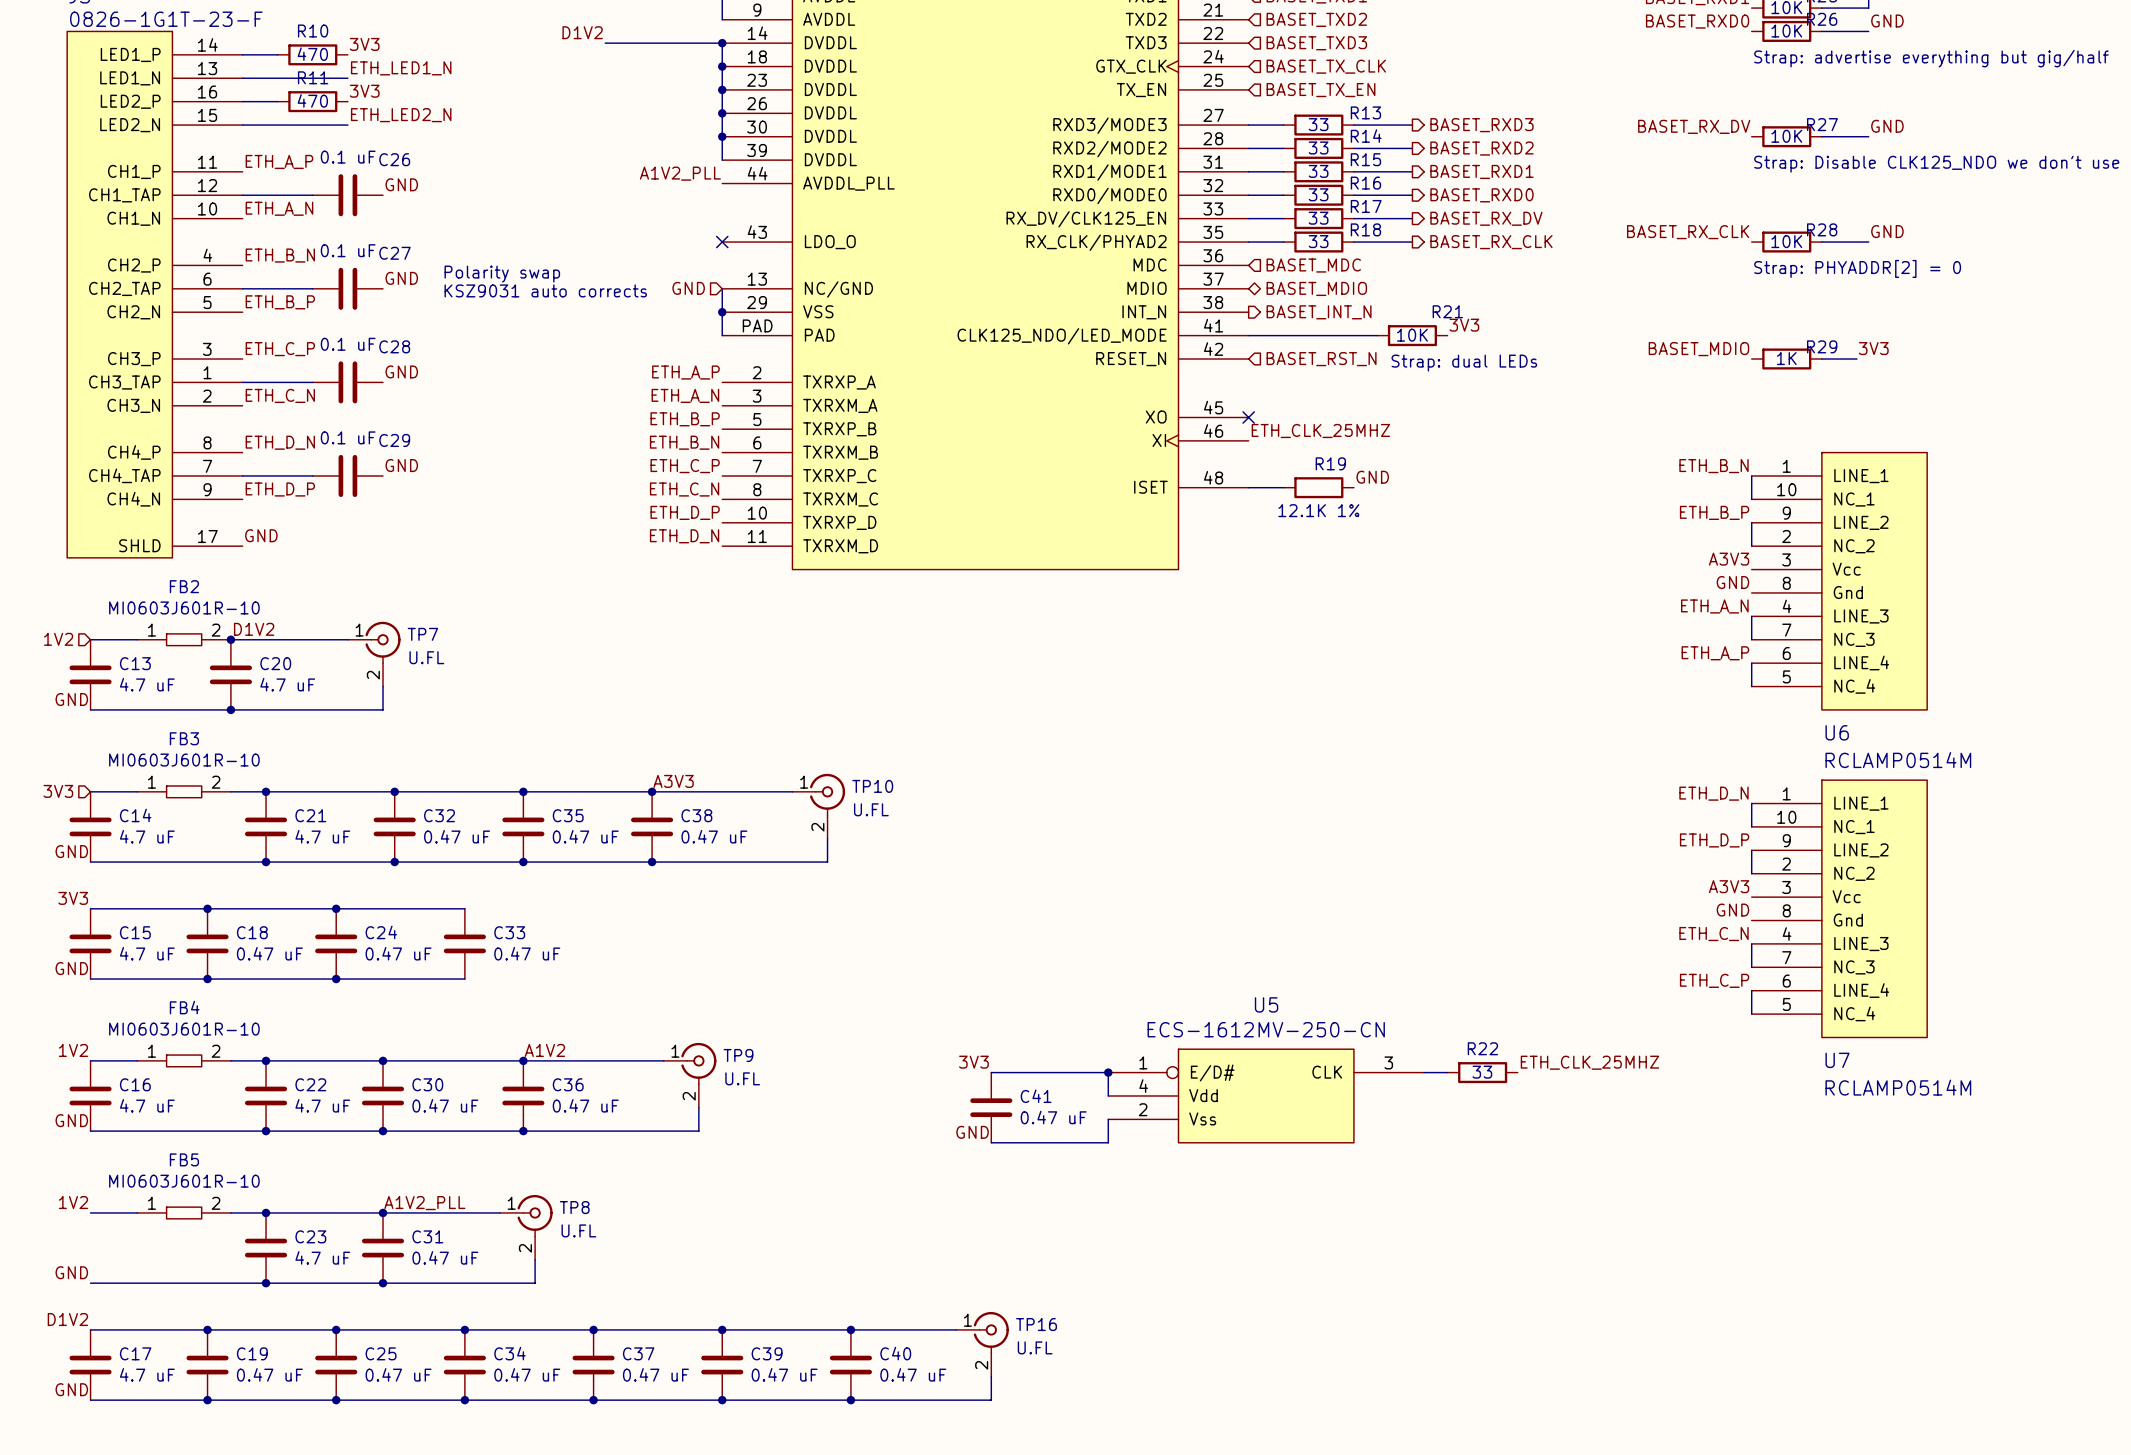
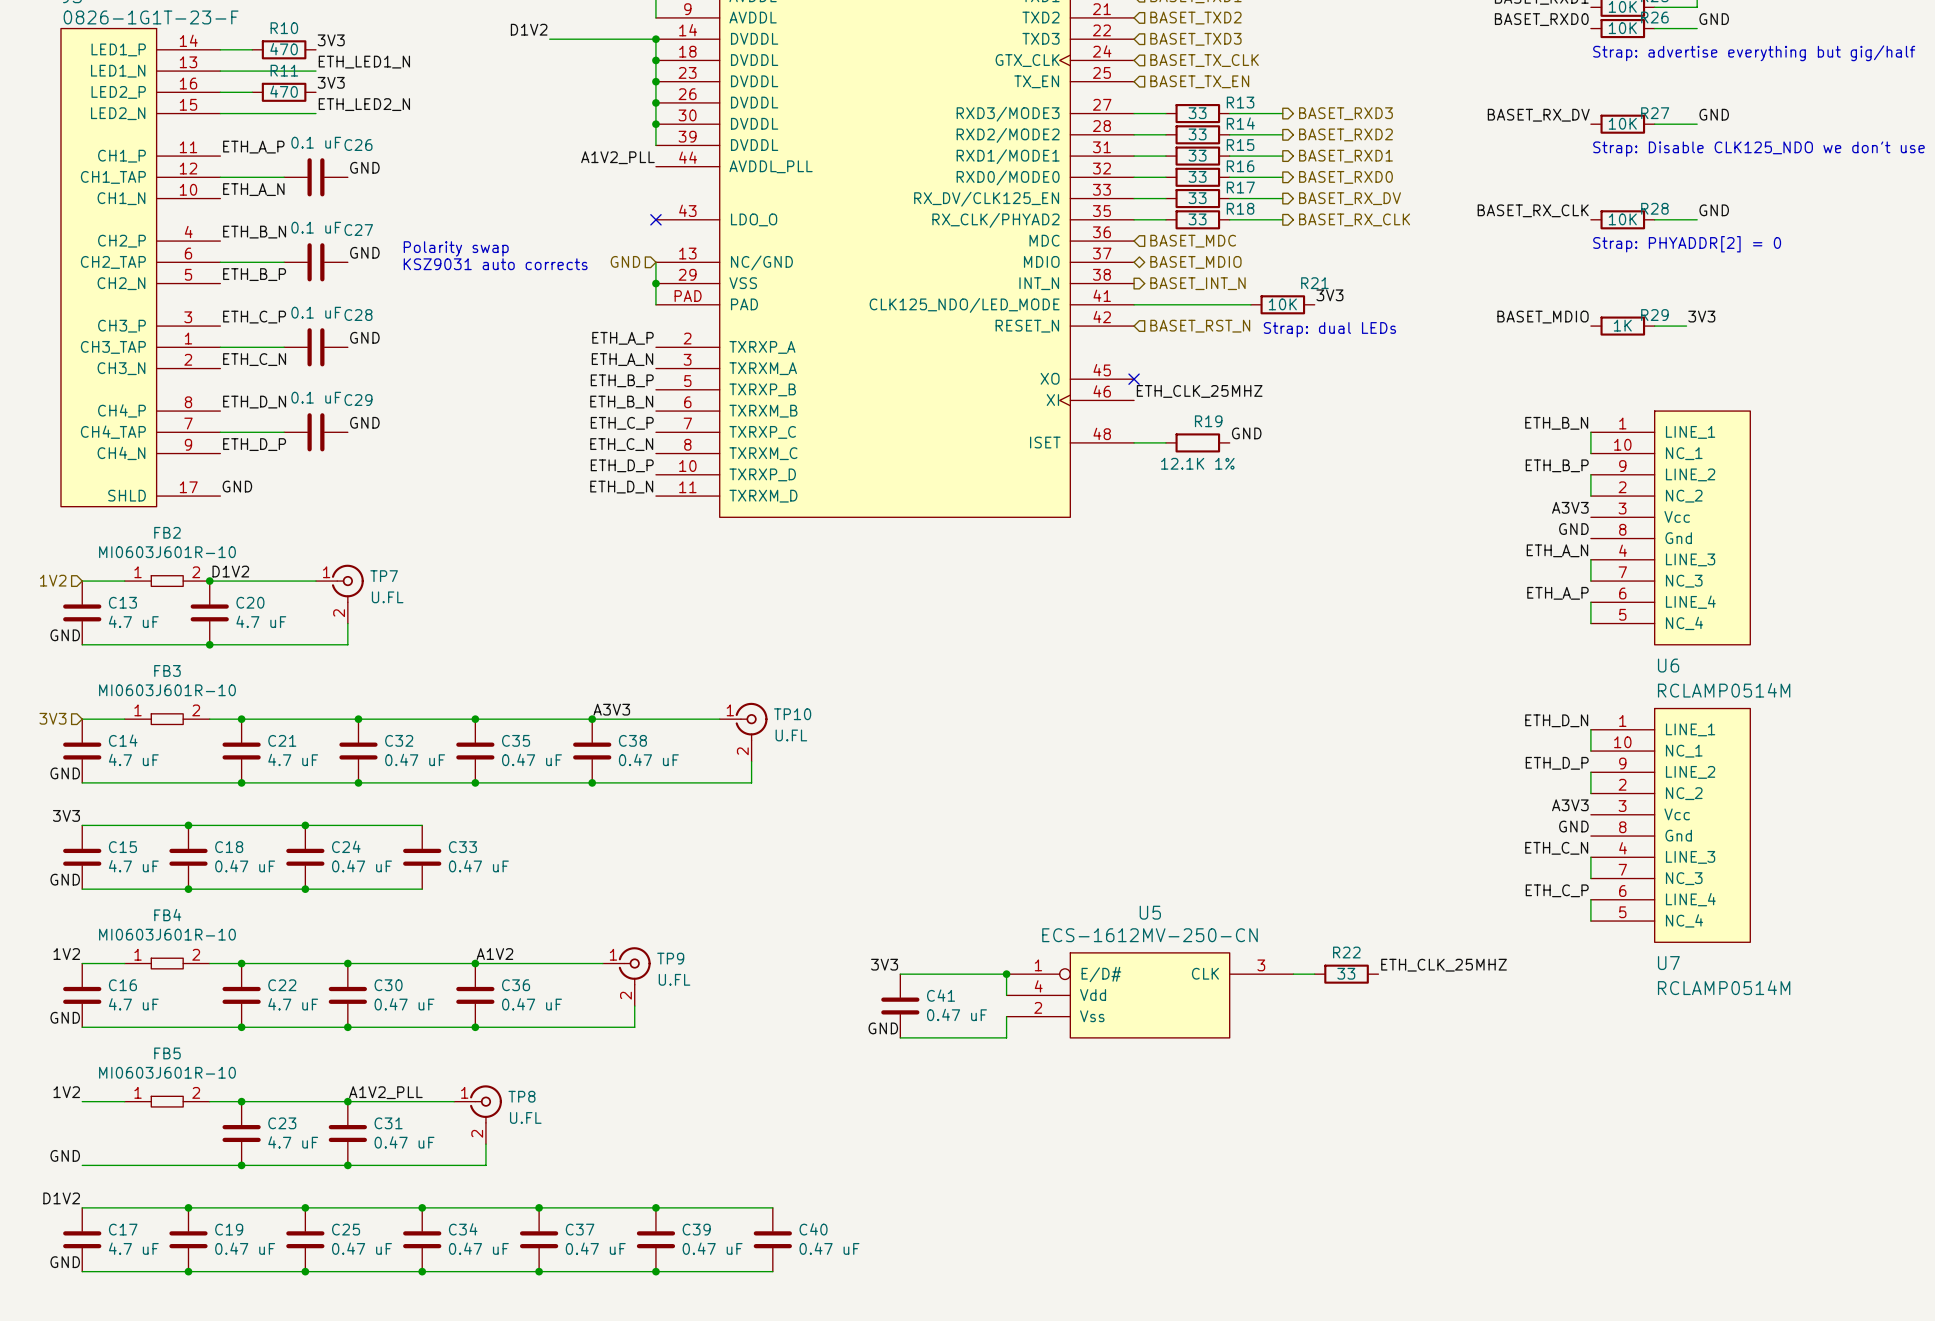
wire: (850, 1329) (956, 1329) -> none
junction: (850, 1329) -> none
TP16: U.FL (982, 1344) -> none
wire: (991, 1376) (991, 1400) (850, 1400) -> none
junction: (850, 1400) -> none

